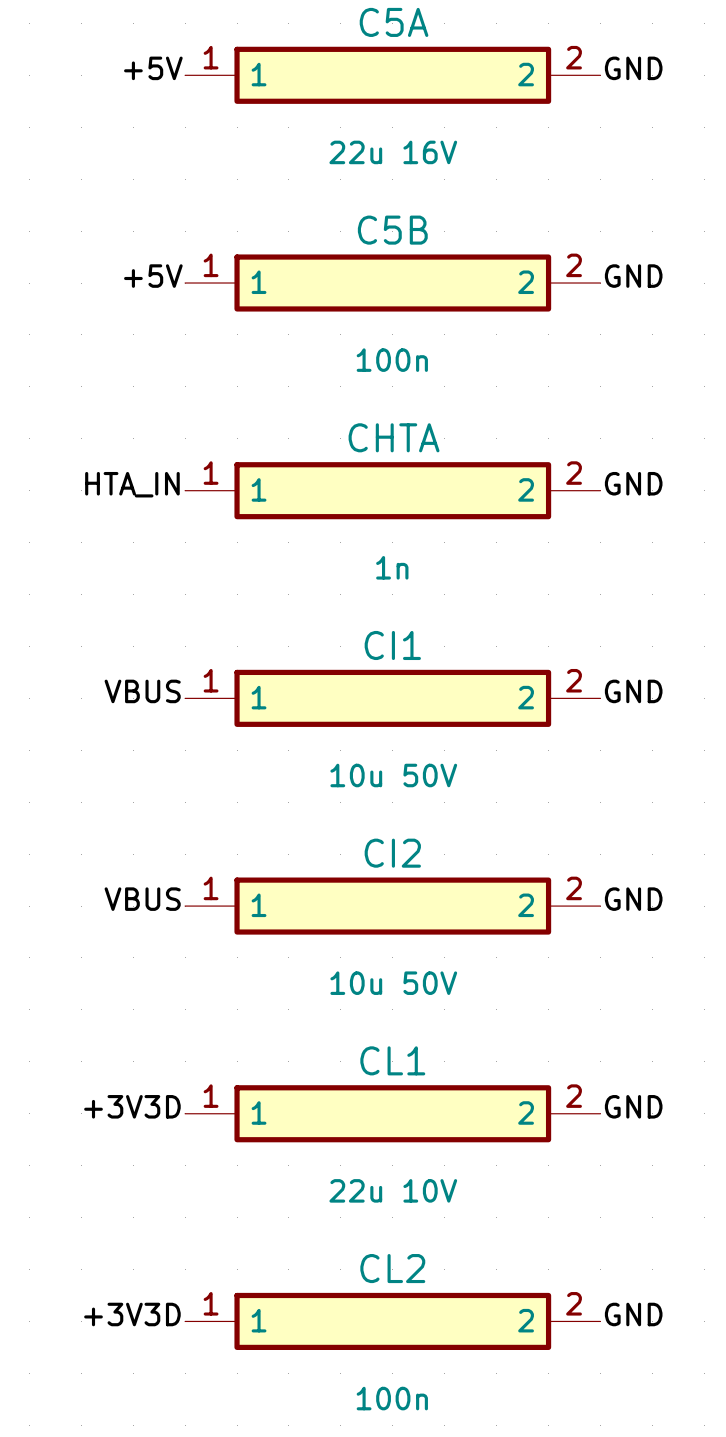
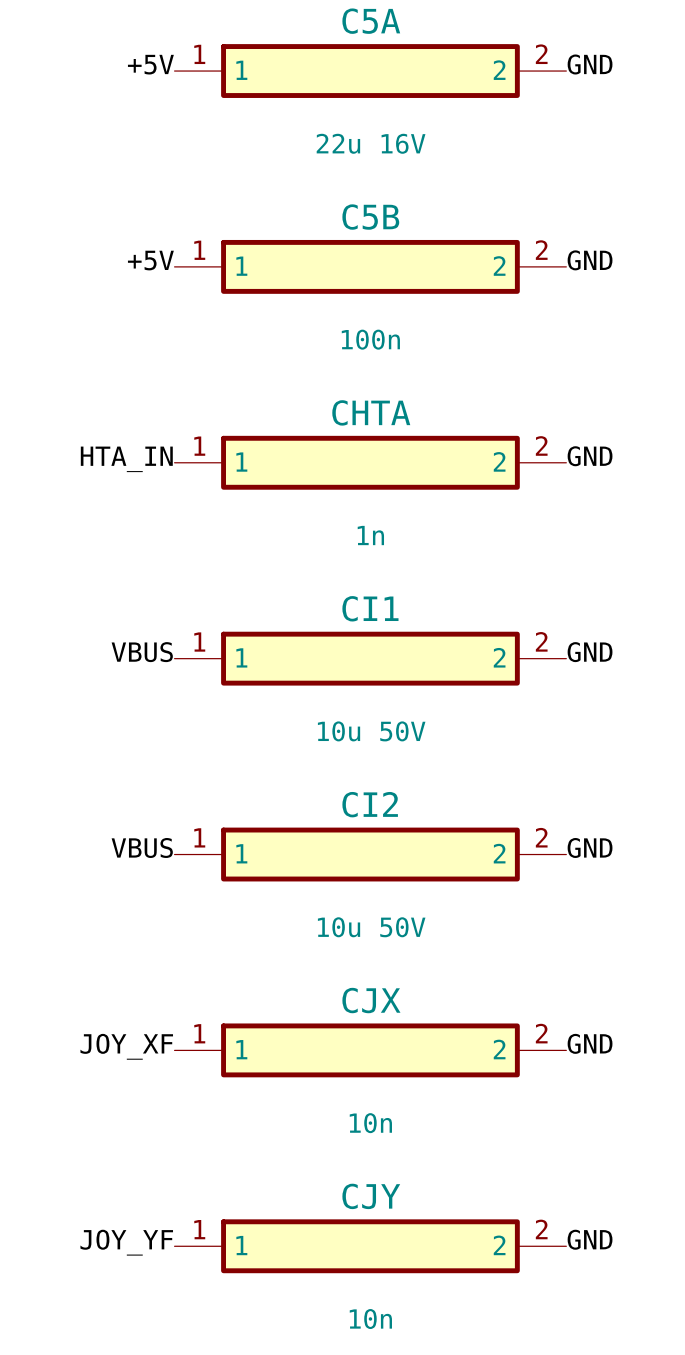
CL1 name: CL1 (392, 1060) -> CJX (371, 1000)
label: +3V3D (132, 1106) -> JOY_XF (126, 1046)
CL1 value: 22u 10V (393, 1190) -> 10n (370, 1123)
CL2 name: CL2 (392, 1268) -> CJY (371, 1196)
label: +3V3D (132, 1314) -> JOY_YF (126, 1242)
CL2 value: 100n (392, 1398) -> 10n (370, 1319)

